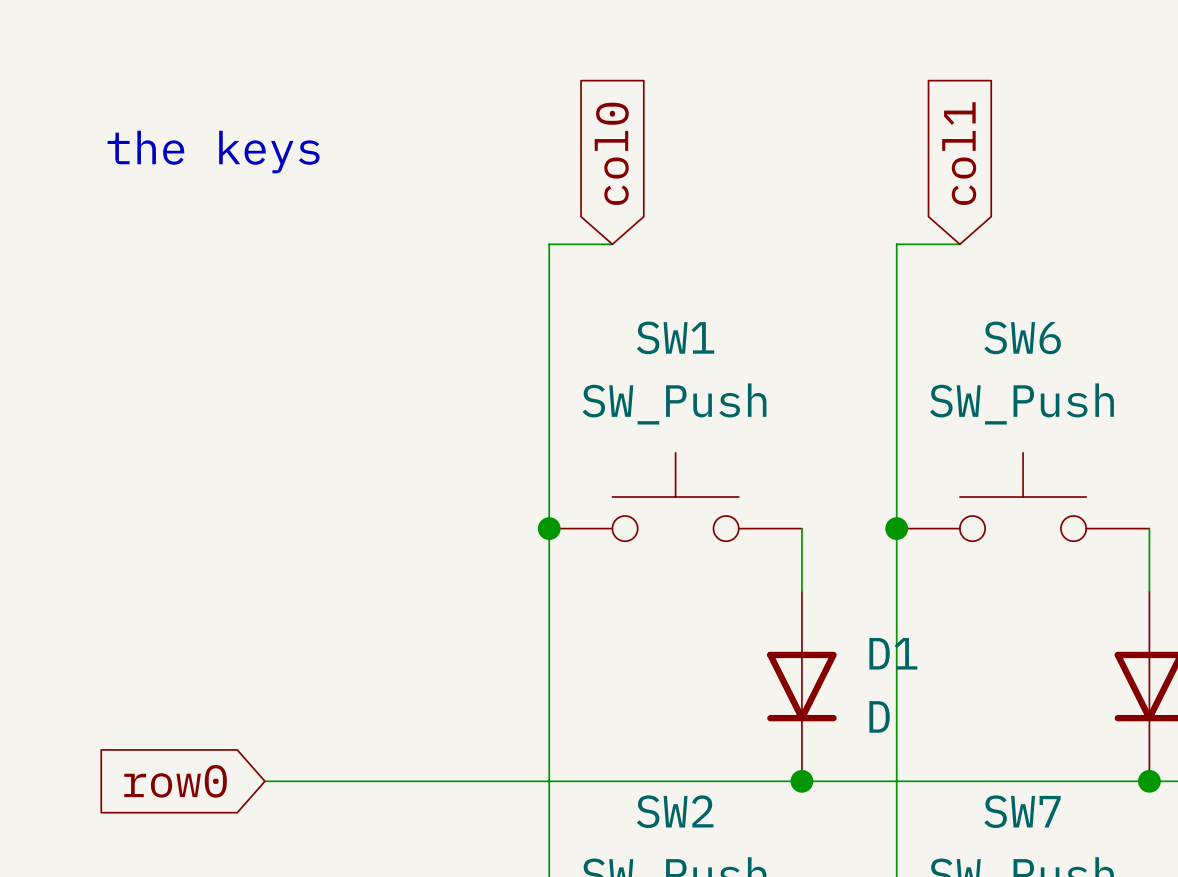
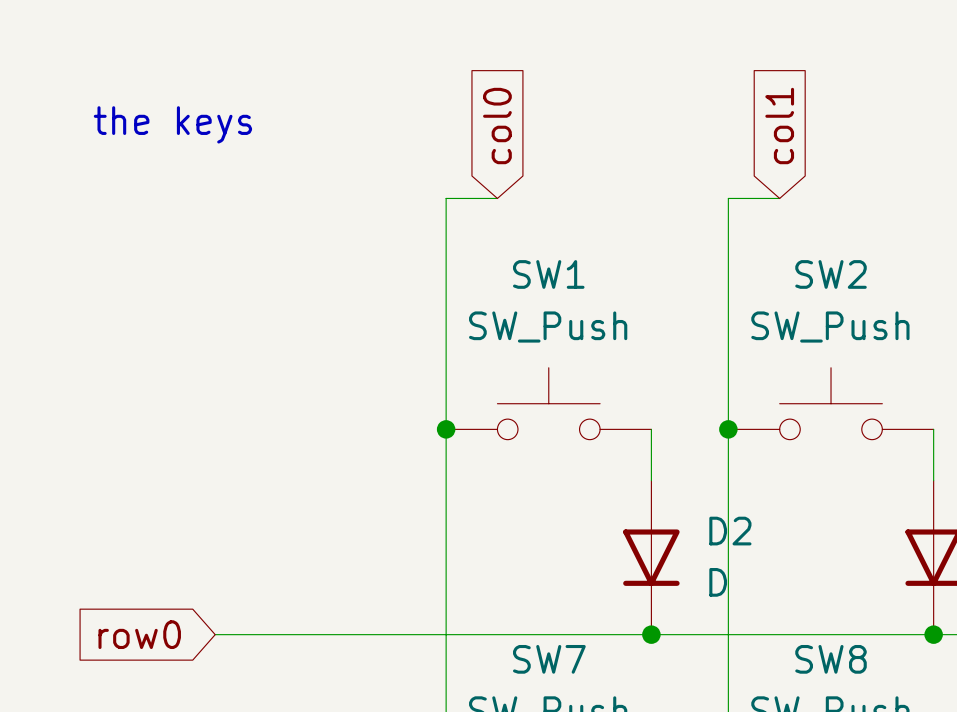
SW6 name: SW6 (1022, 337) -> SW2 (831, 274)
D1 name: D1 (893, 653) -> D2 (730, 531)
SW2 name: SW2 (675, 811) -> SW7 (549, 659)
SW7 name: SW7 (1022, 811) -> SW8 (831, 659)

